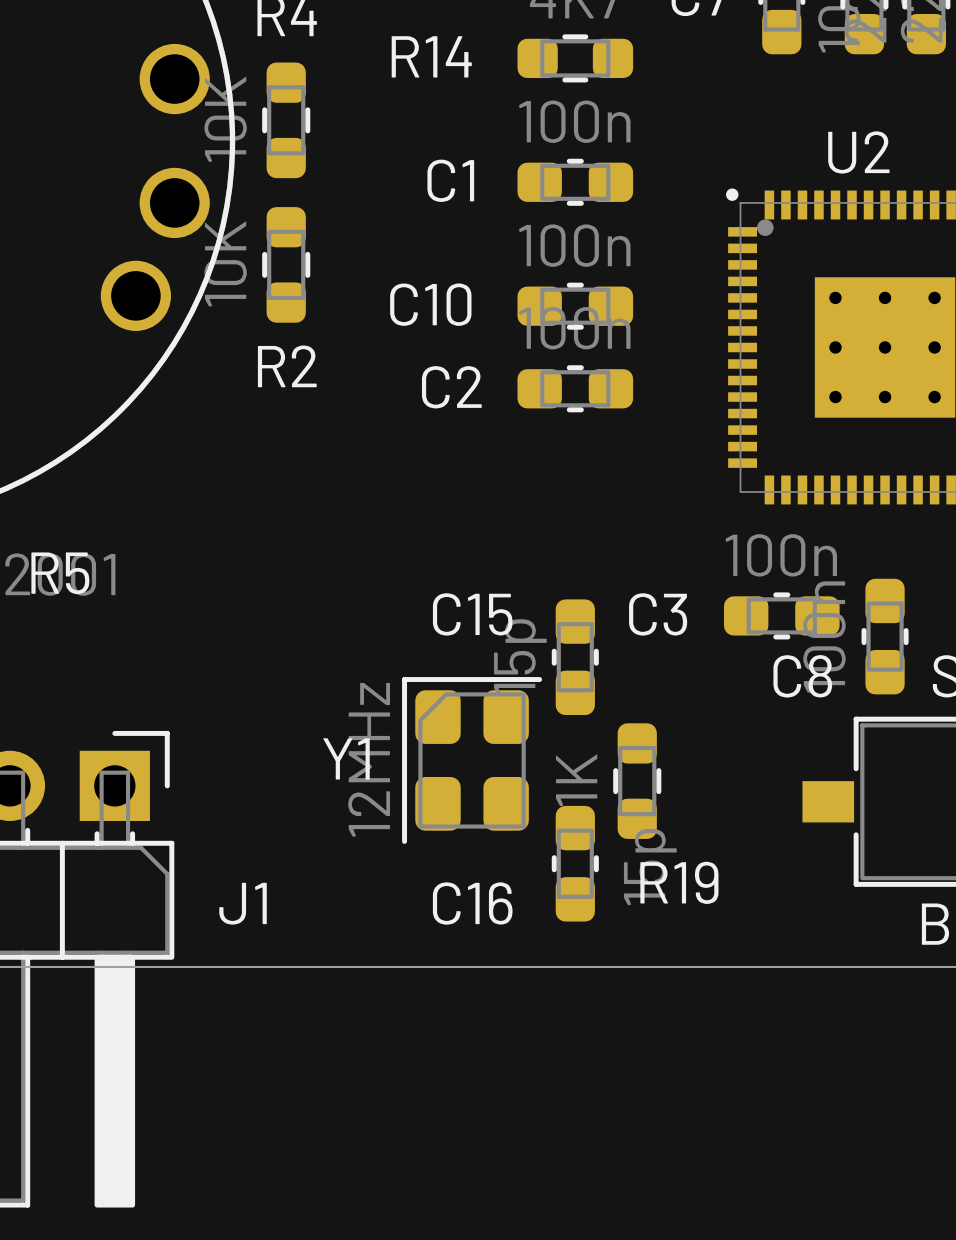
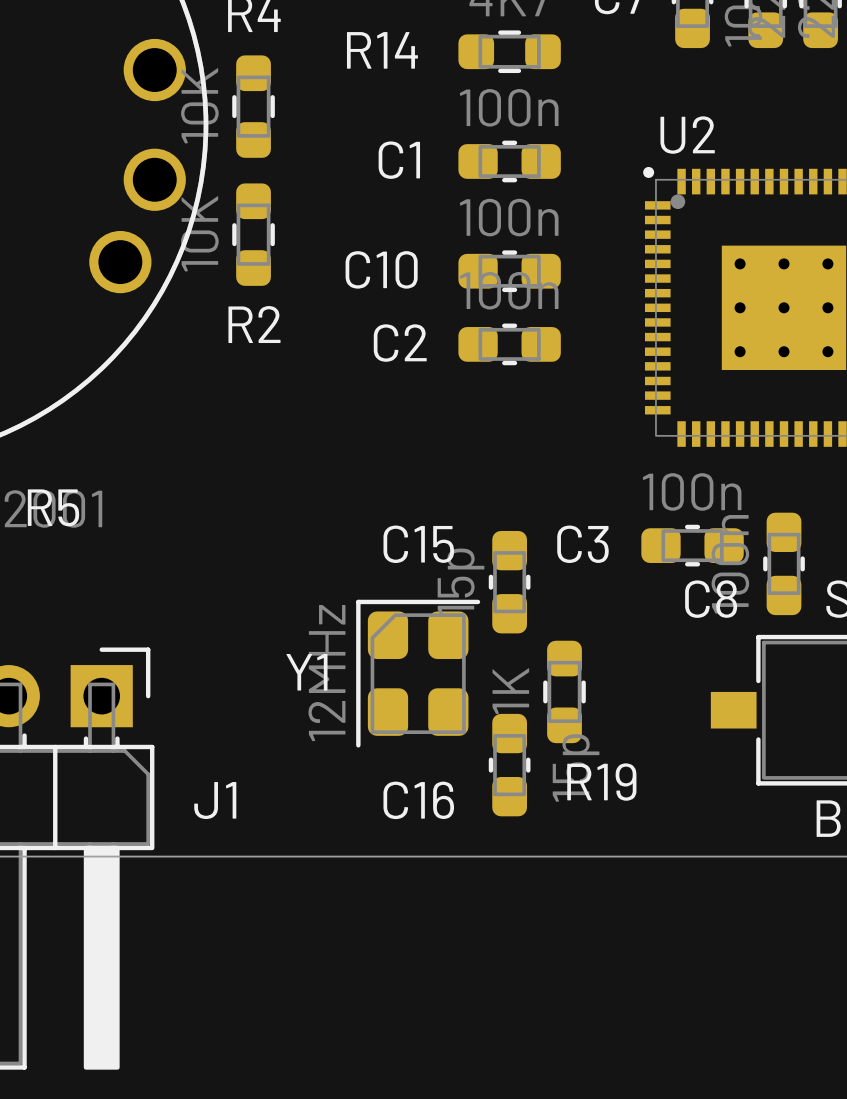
U2 name position: U2 (858, 152) -> U2 (687, 135)

